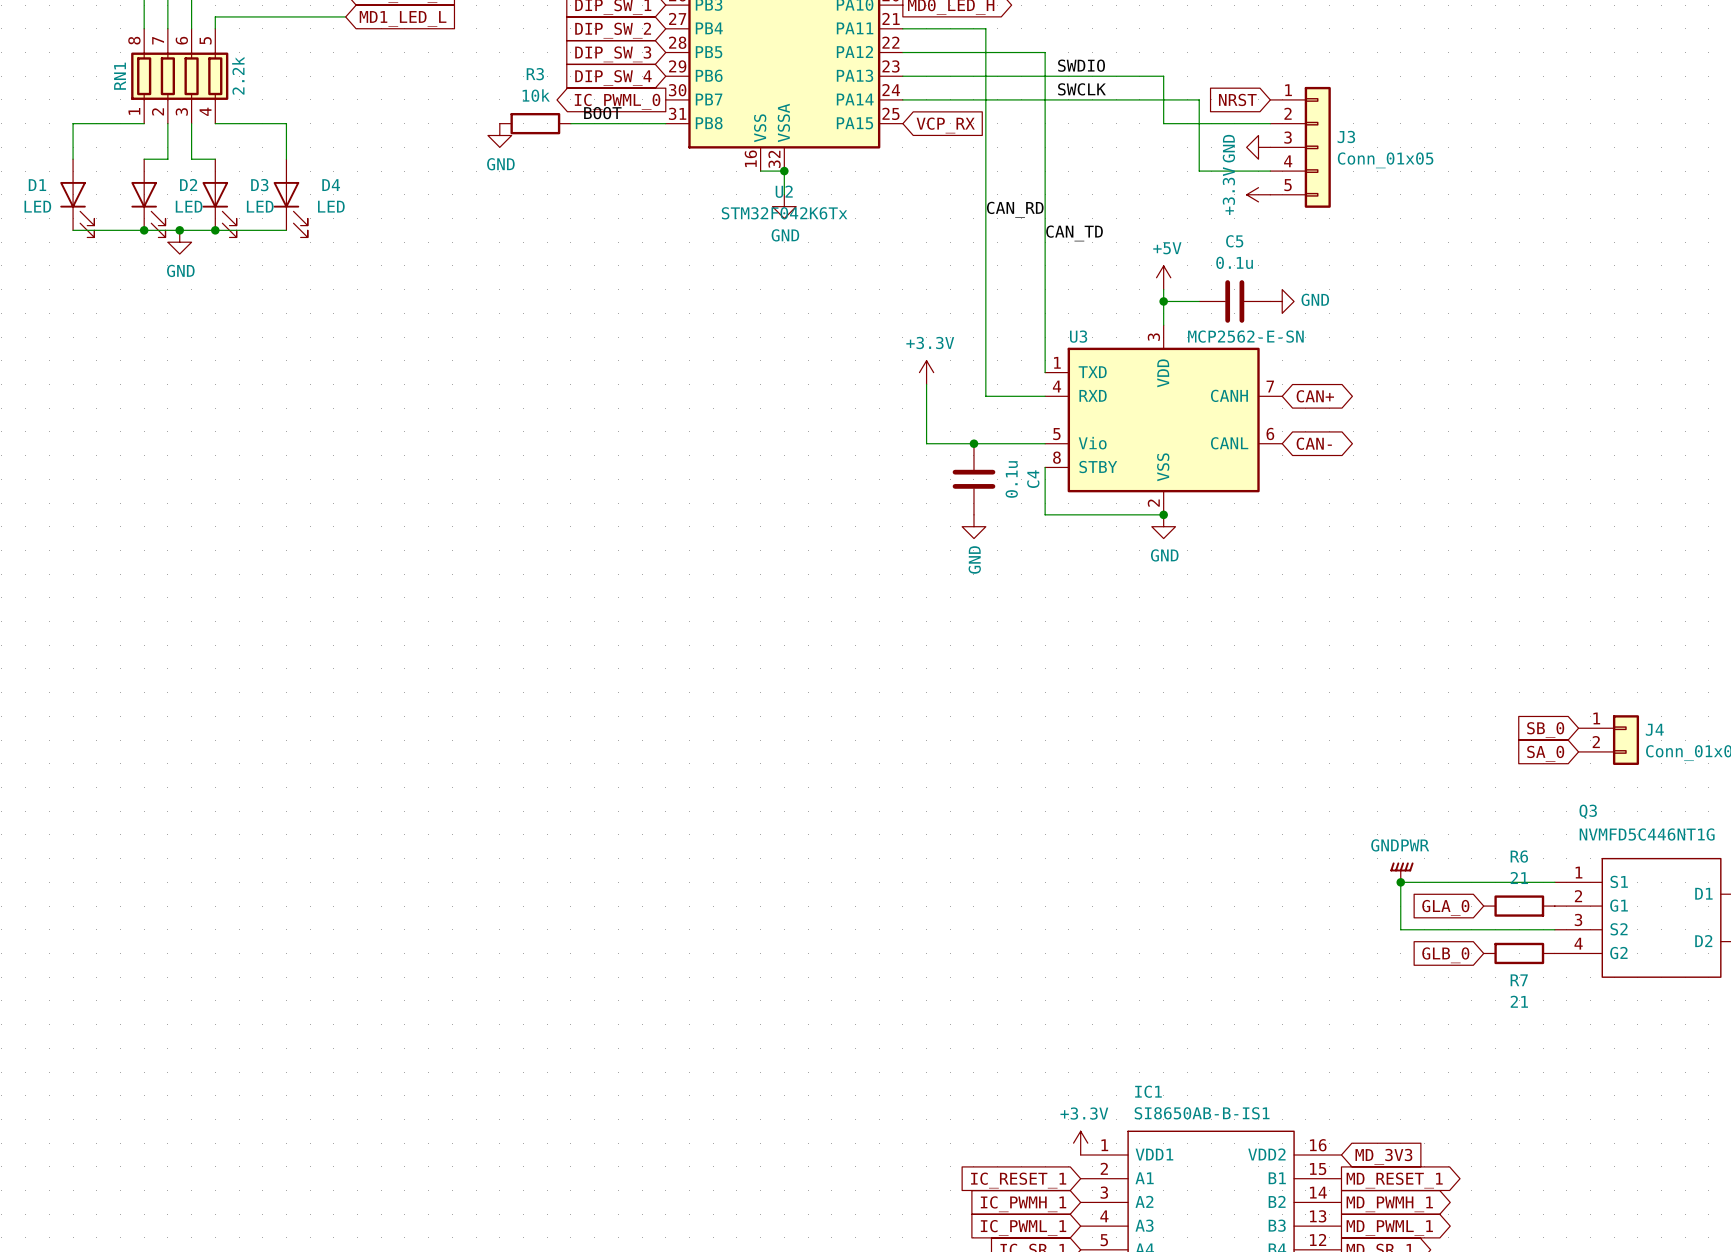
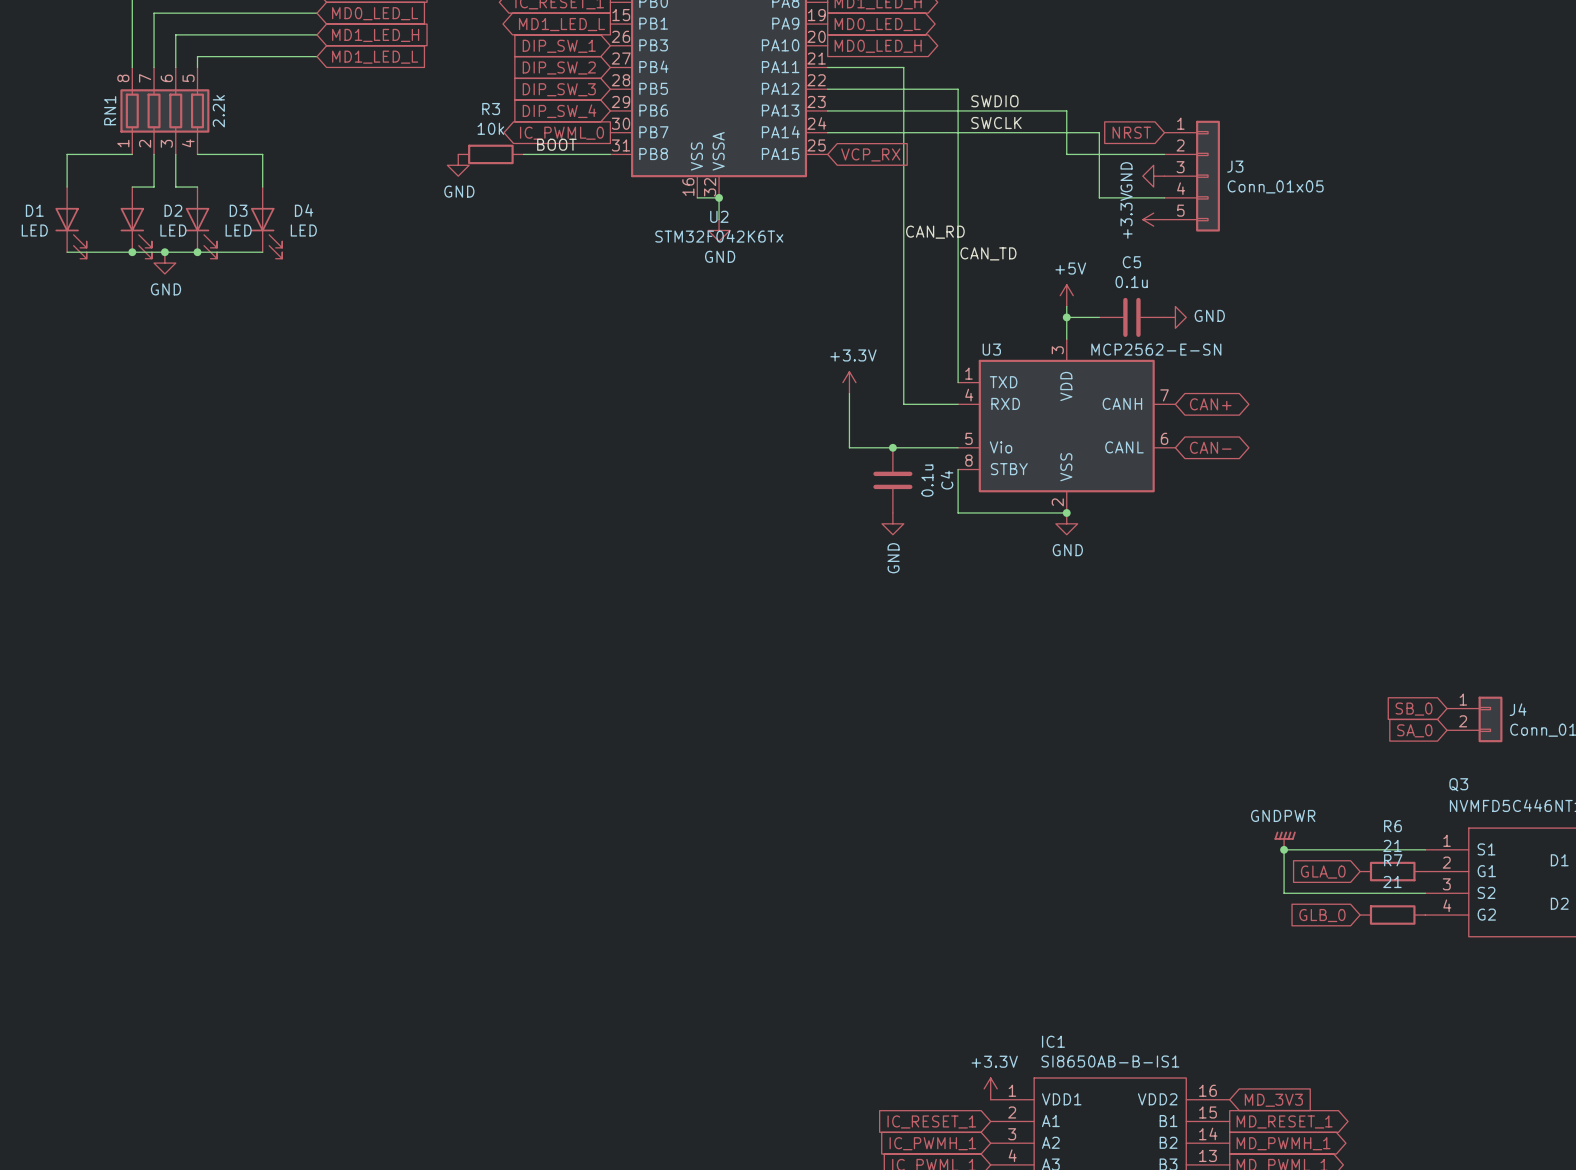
R7 name position: R7 (1519, 980) -> R7 (1393, 860)
R7 value position: 21 (1519, 1001) -> 21 (1392, 882)

